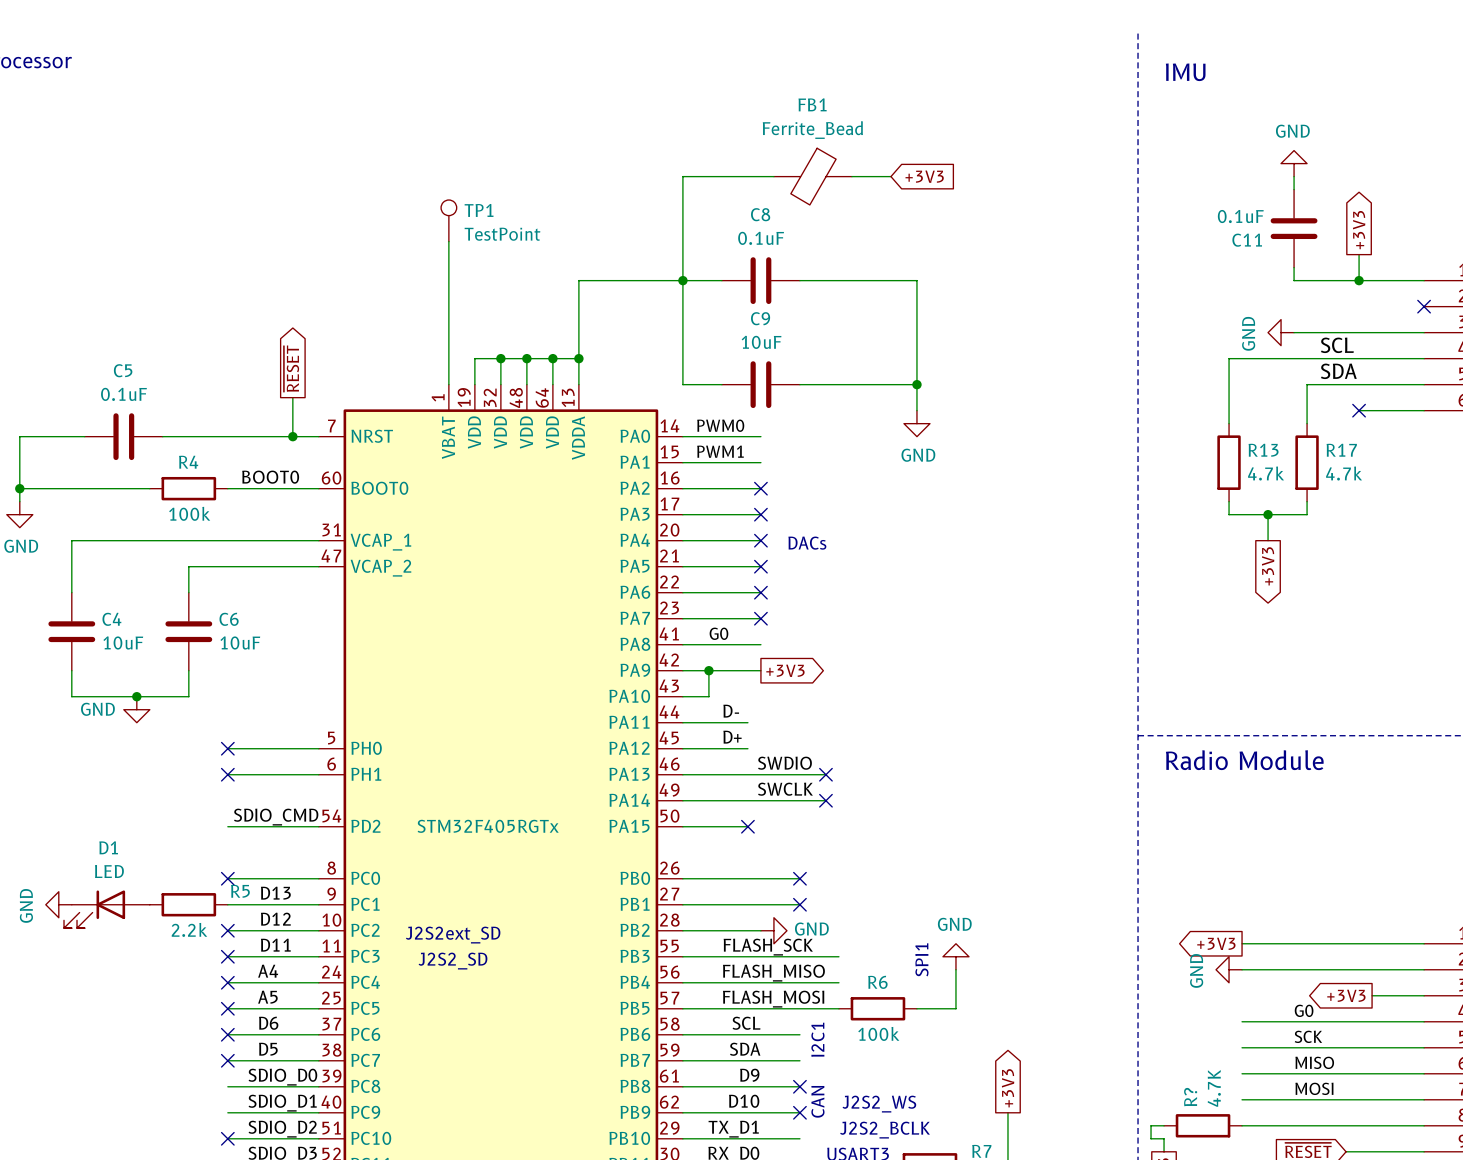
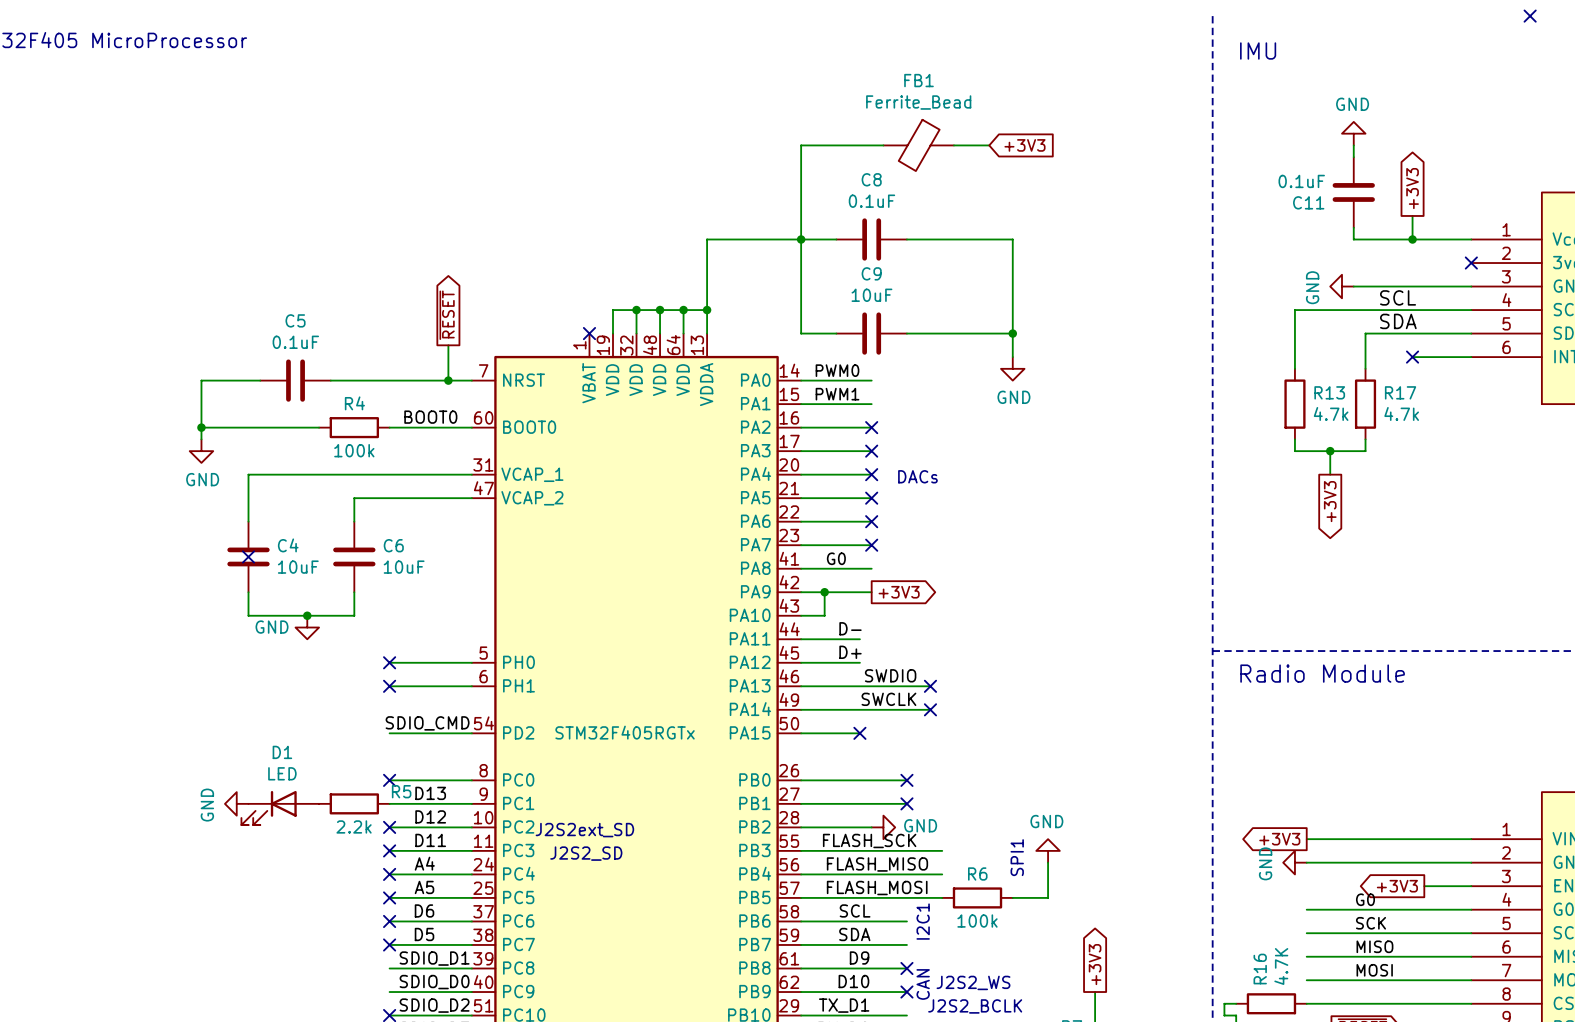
TP1: TestPoint (448, 220) -> none
wire: (448, 241) (448, 384) -> none
no-connect mark: none -> (589, 333)
no-connect mark: none -> (248, 556)
label: SDIO_D0 (282, 1077) -> SDIO_D1 (434, 958)
R? name: R? (1190, 1097) -> R16 (1260, 969)
label: SDIO_D1 (282, 1103) -> SDIO_D0 (434, 982)

